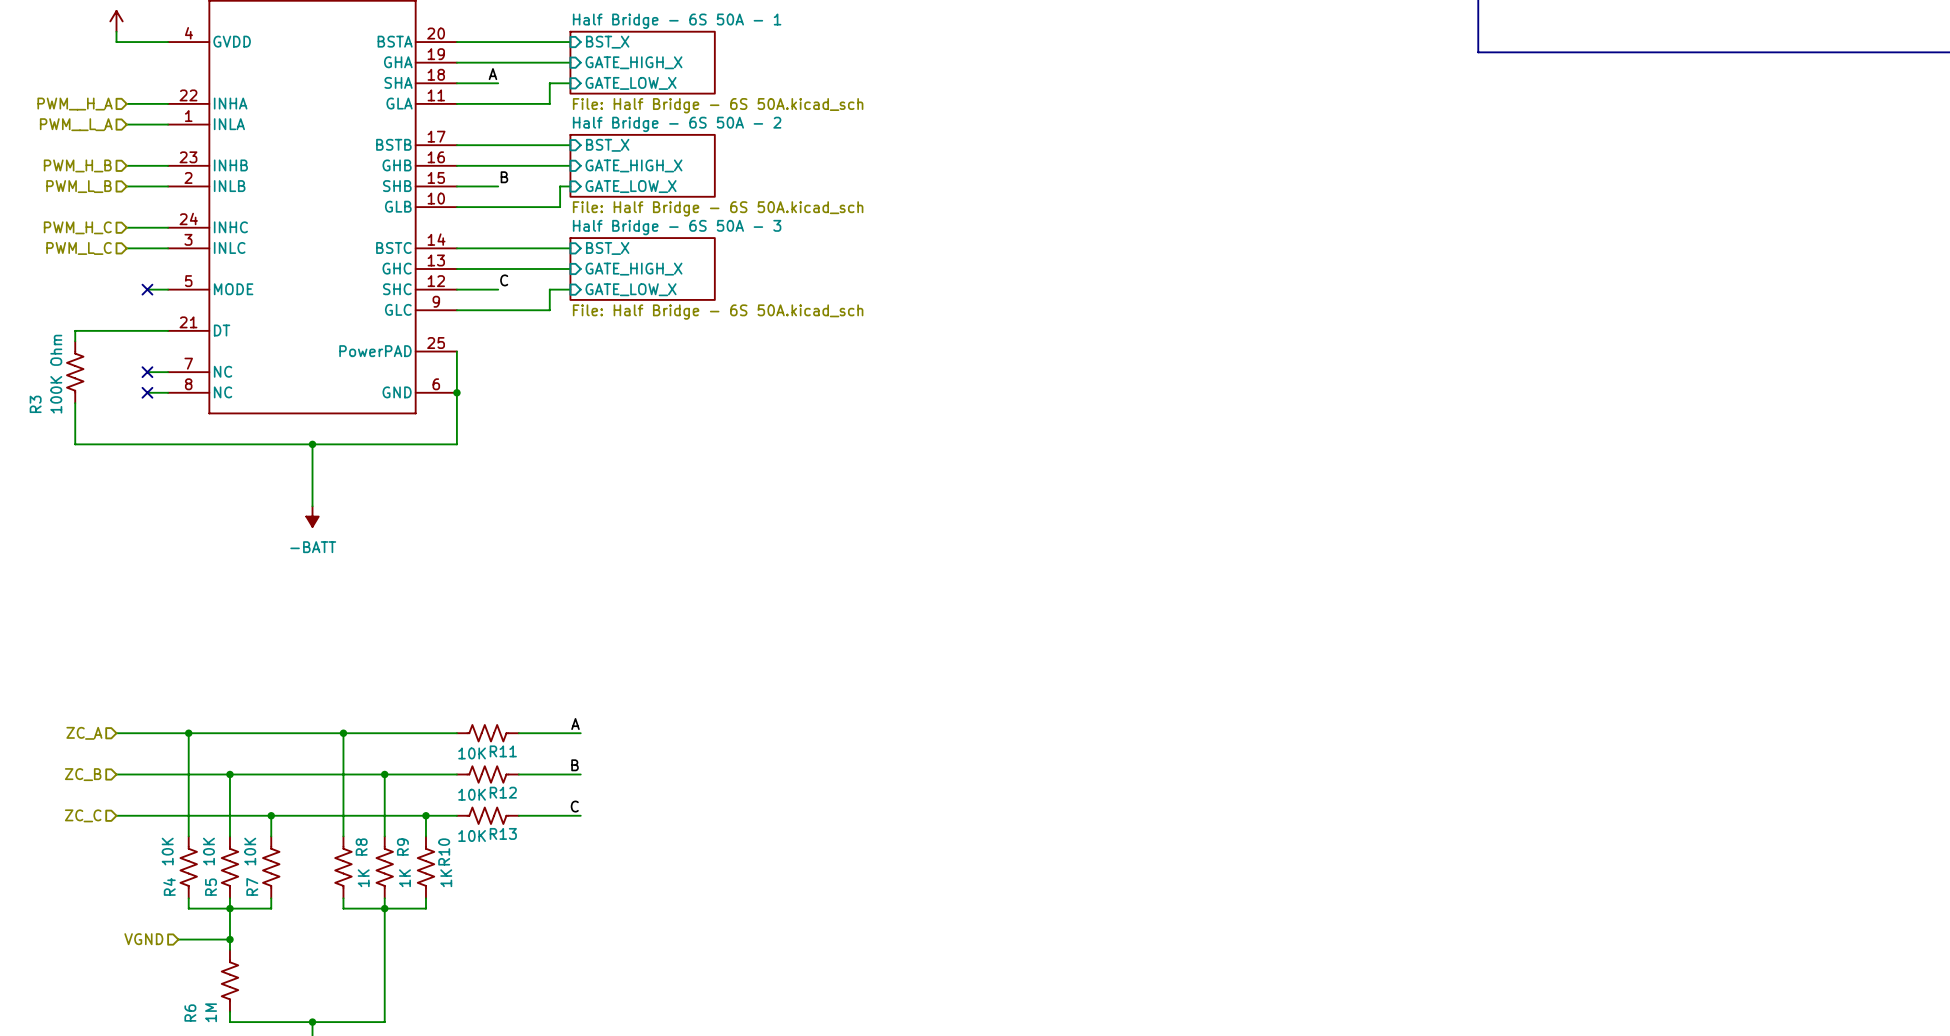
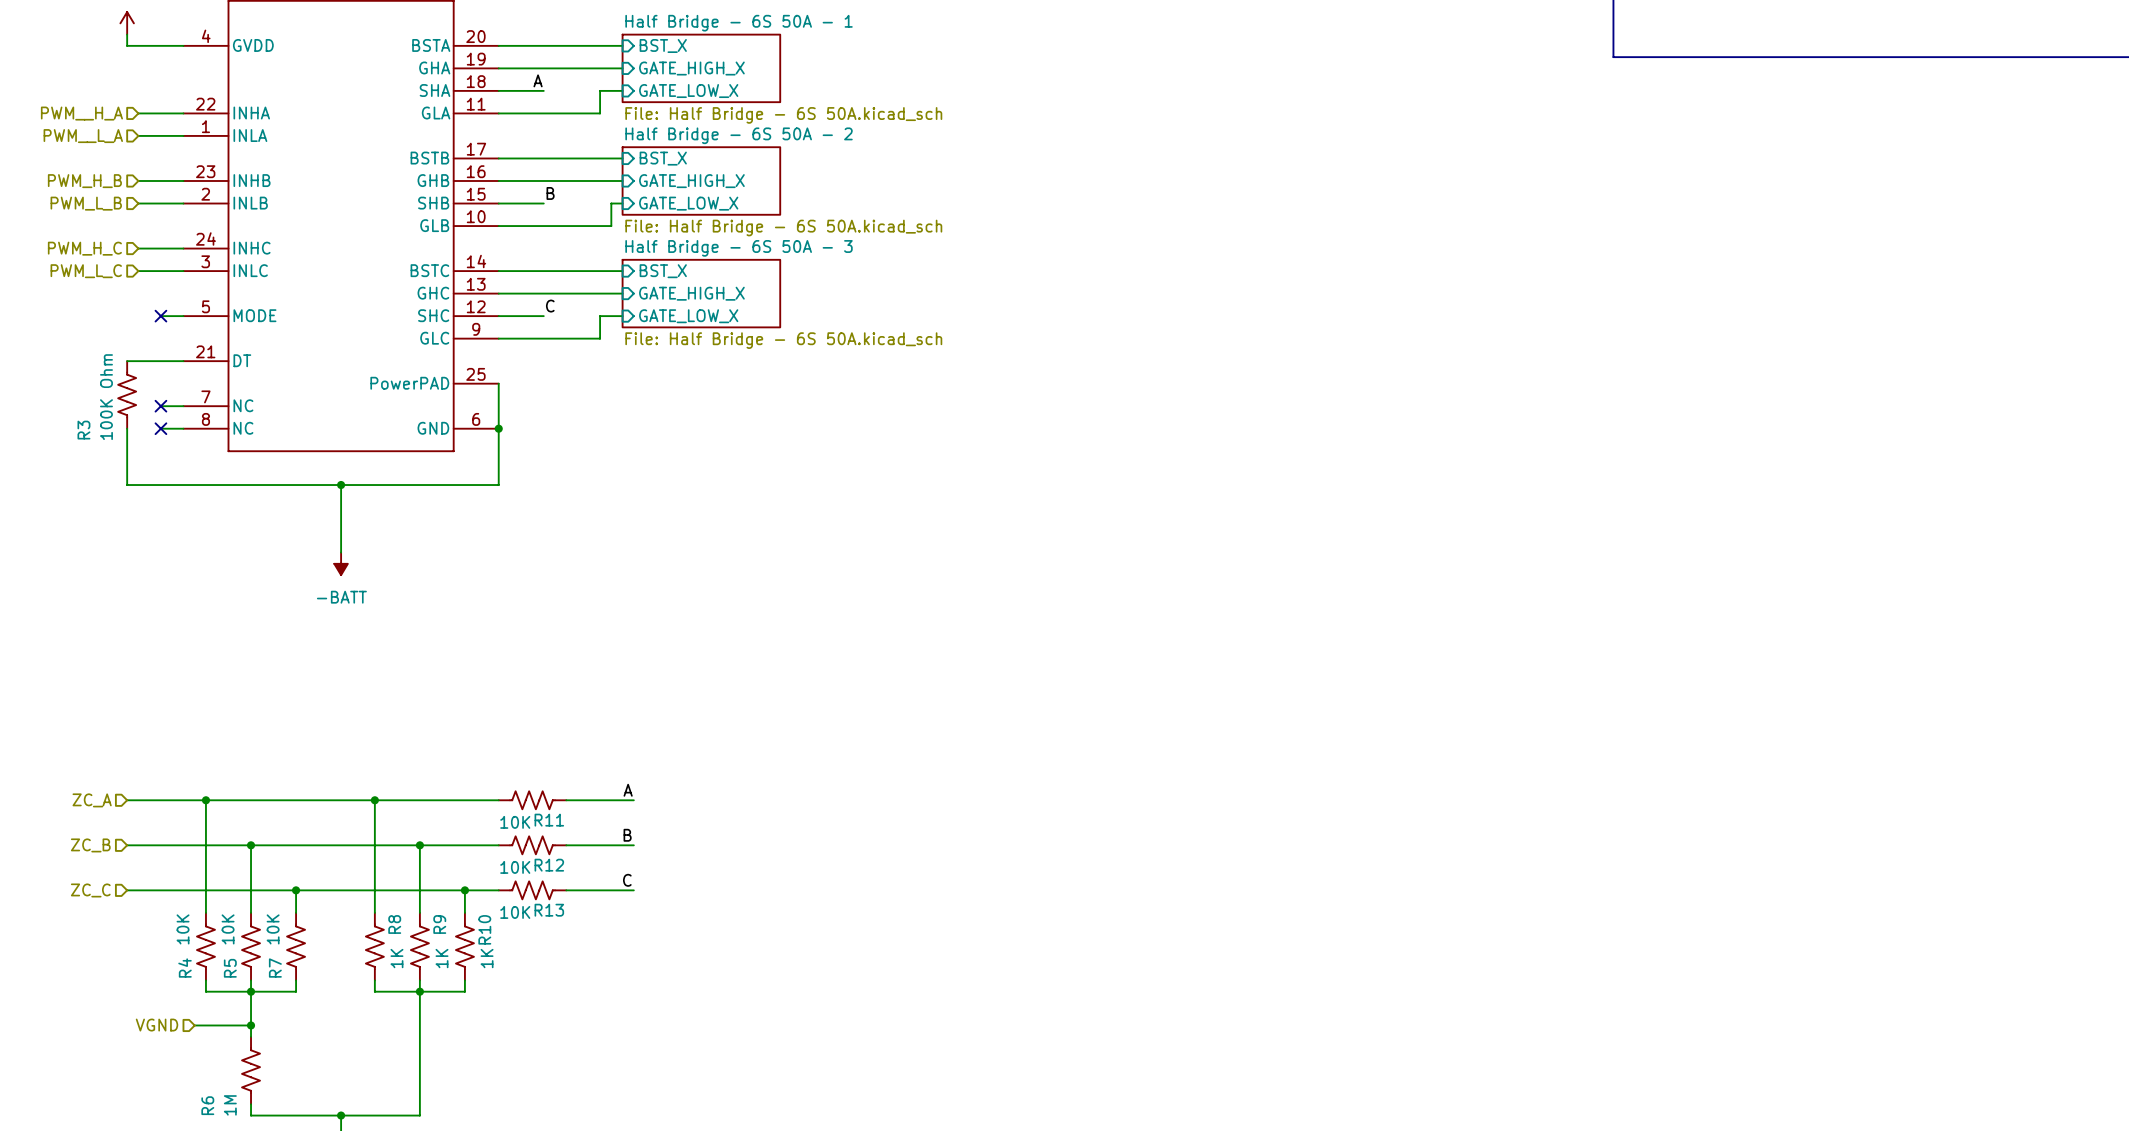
wire: (116, 330) (75, 330) (75, 341) -> none
R3 position: (75, 372) -> (127, 394)
wire: (75, 403) (75, 444) (116, 444) -> (127, 428) (127, 485)

